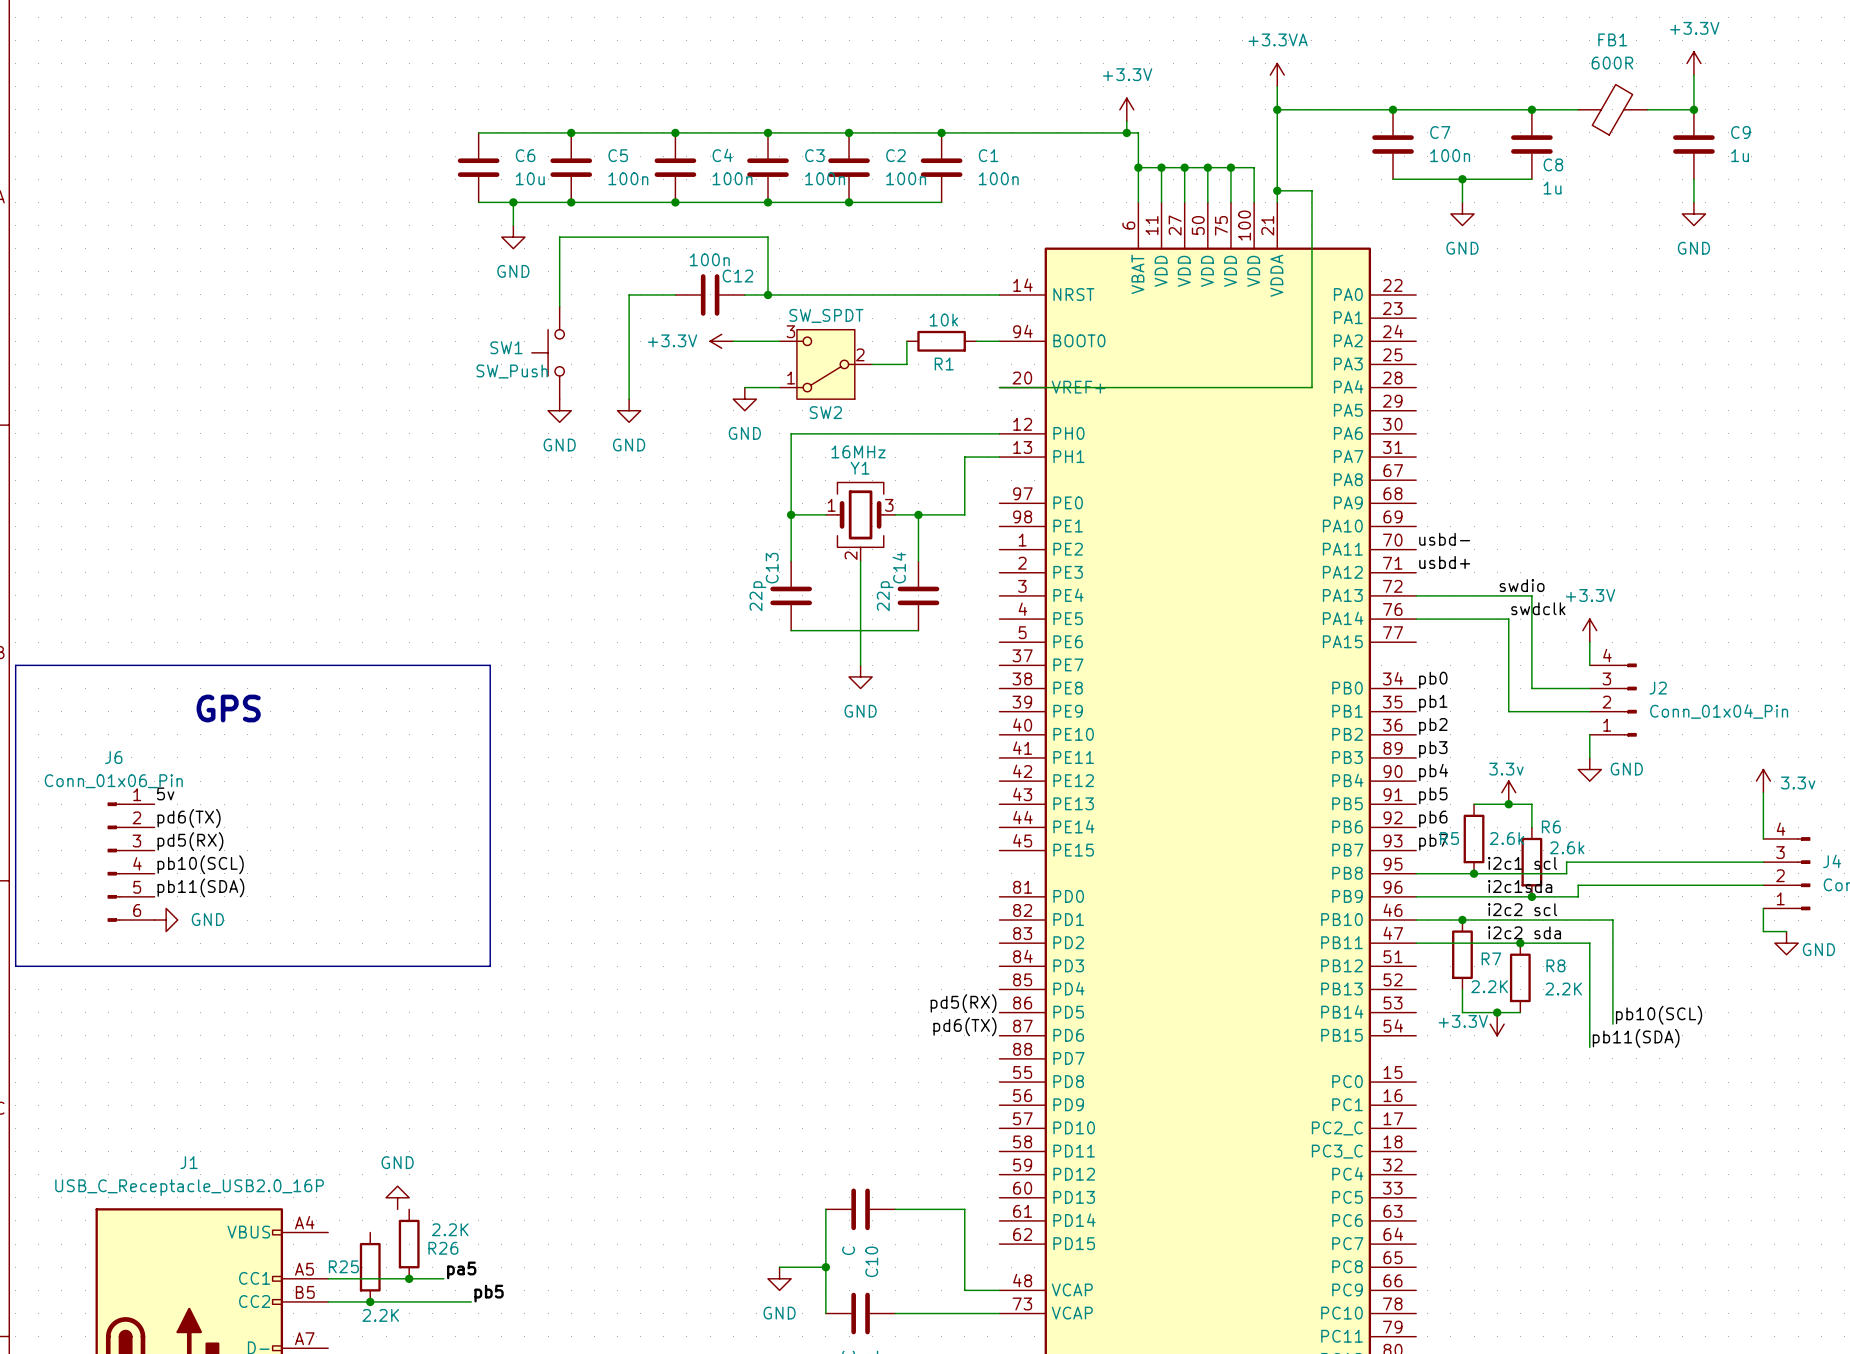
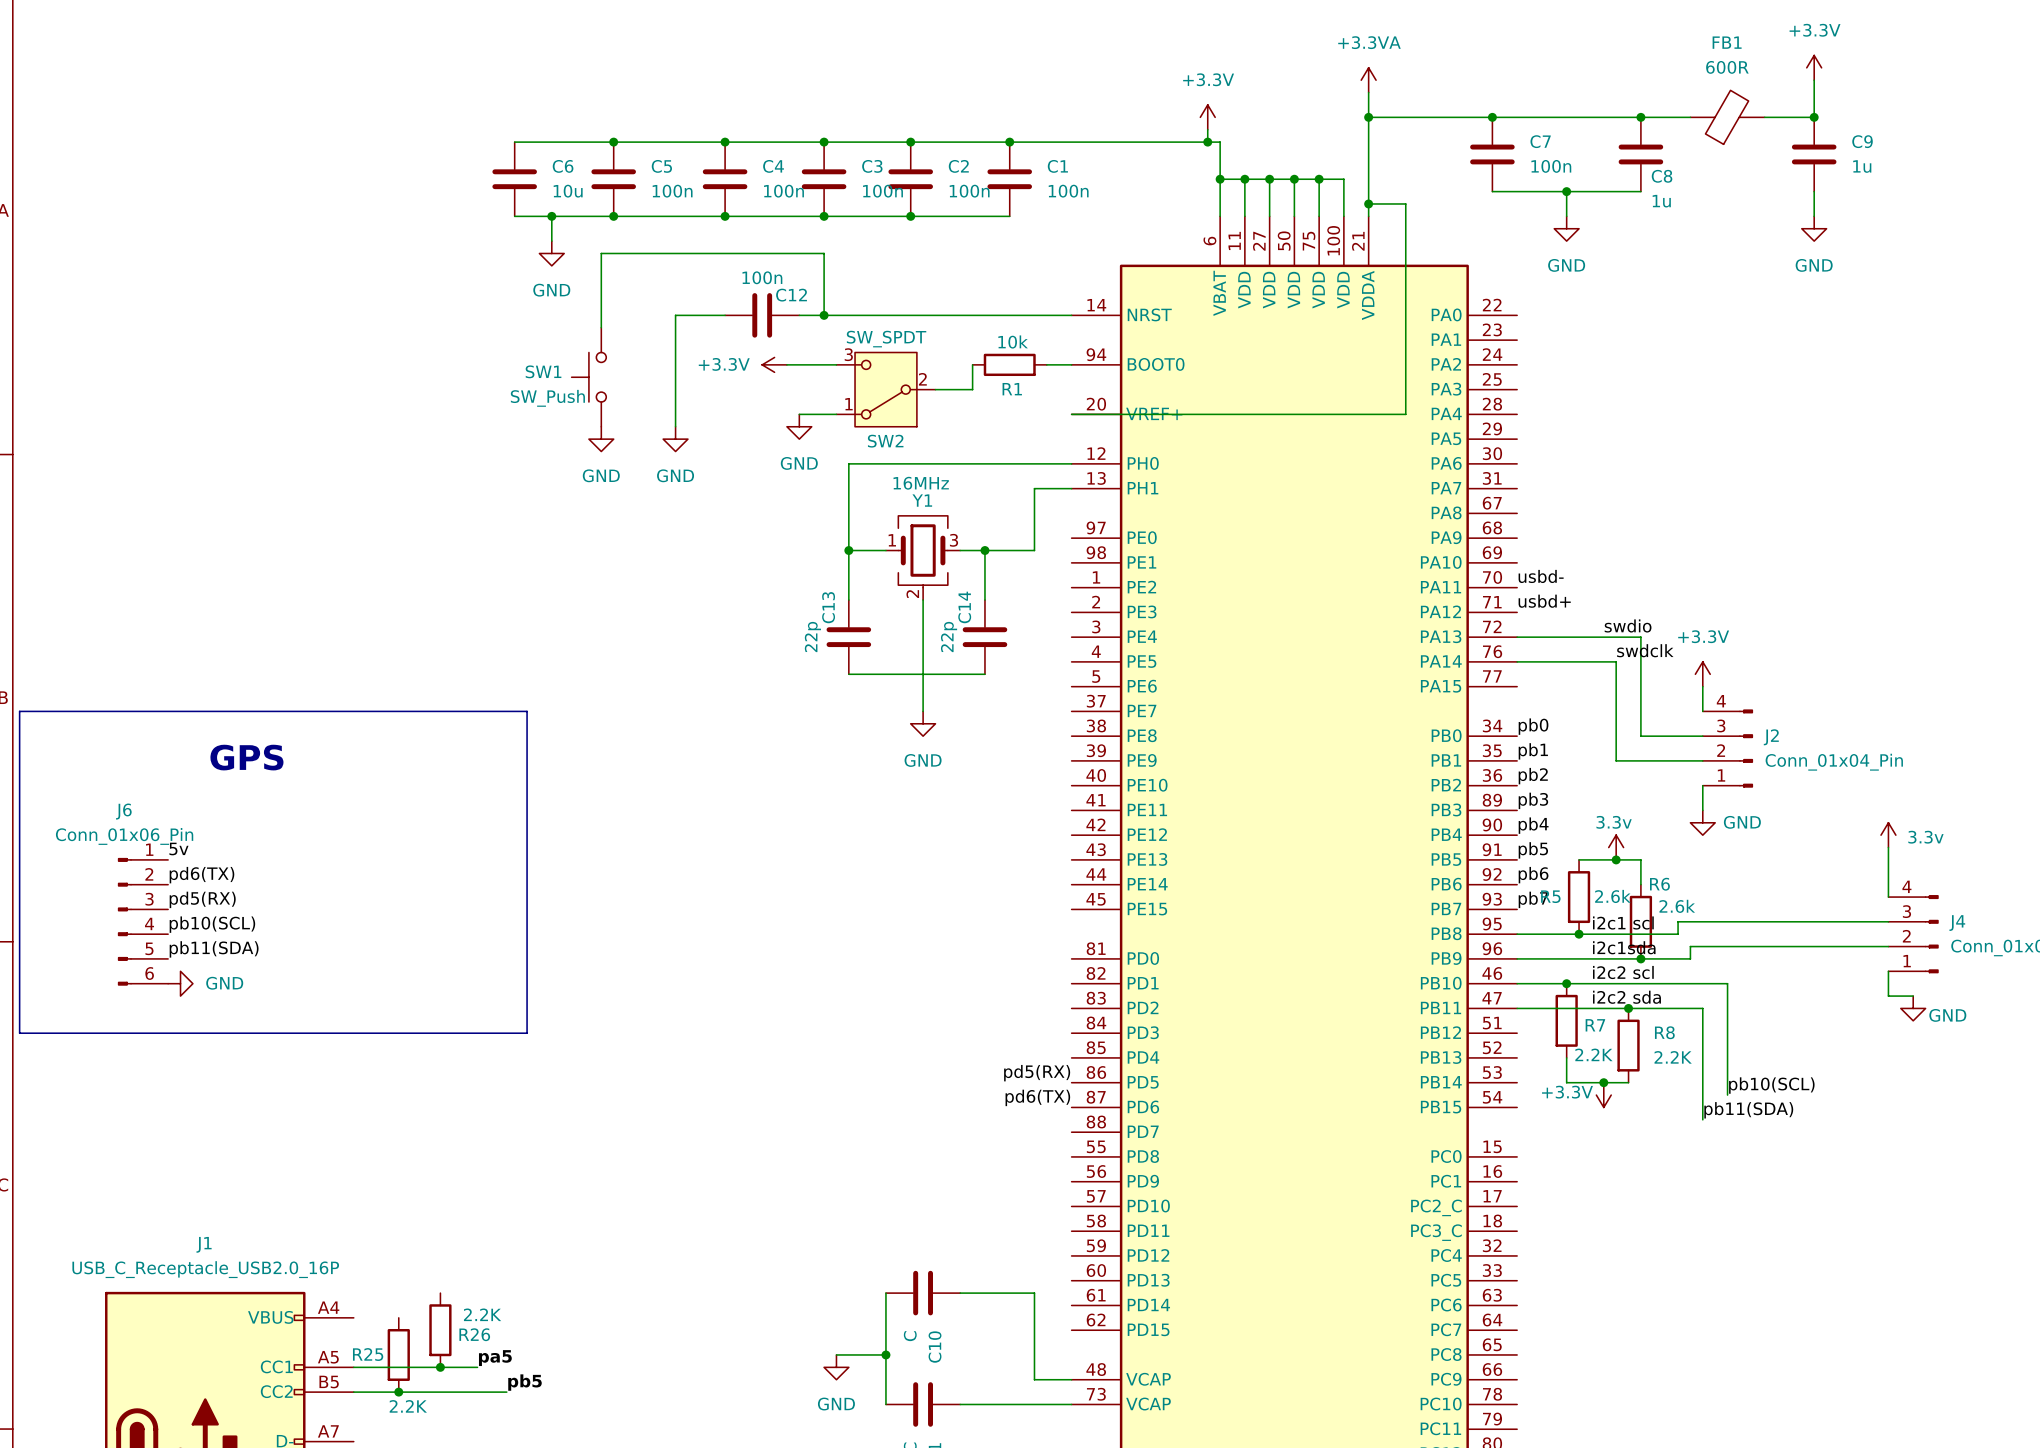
power symbol: GND (397, 1197) -> none

